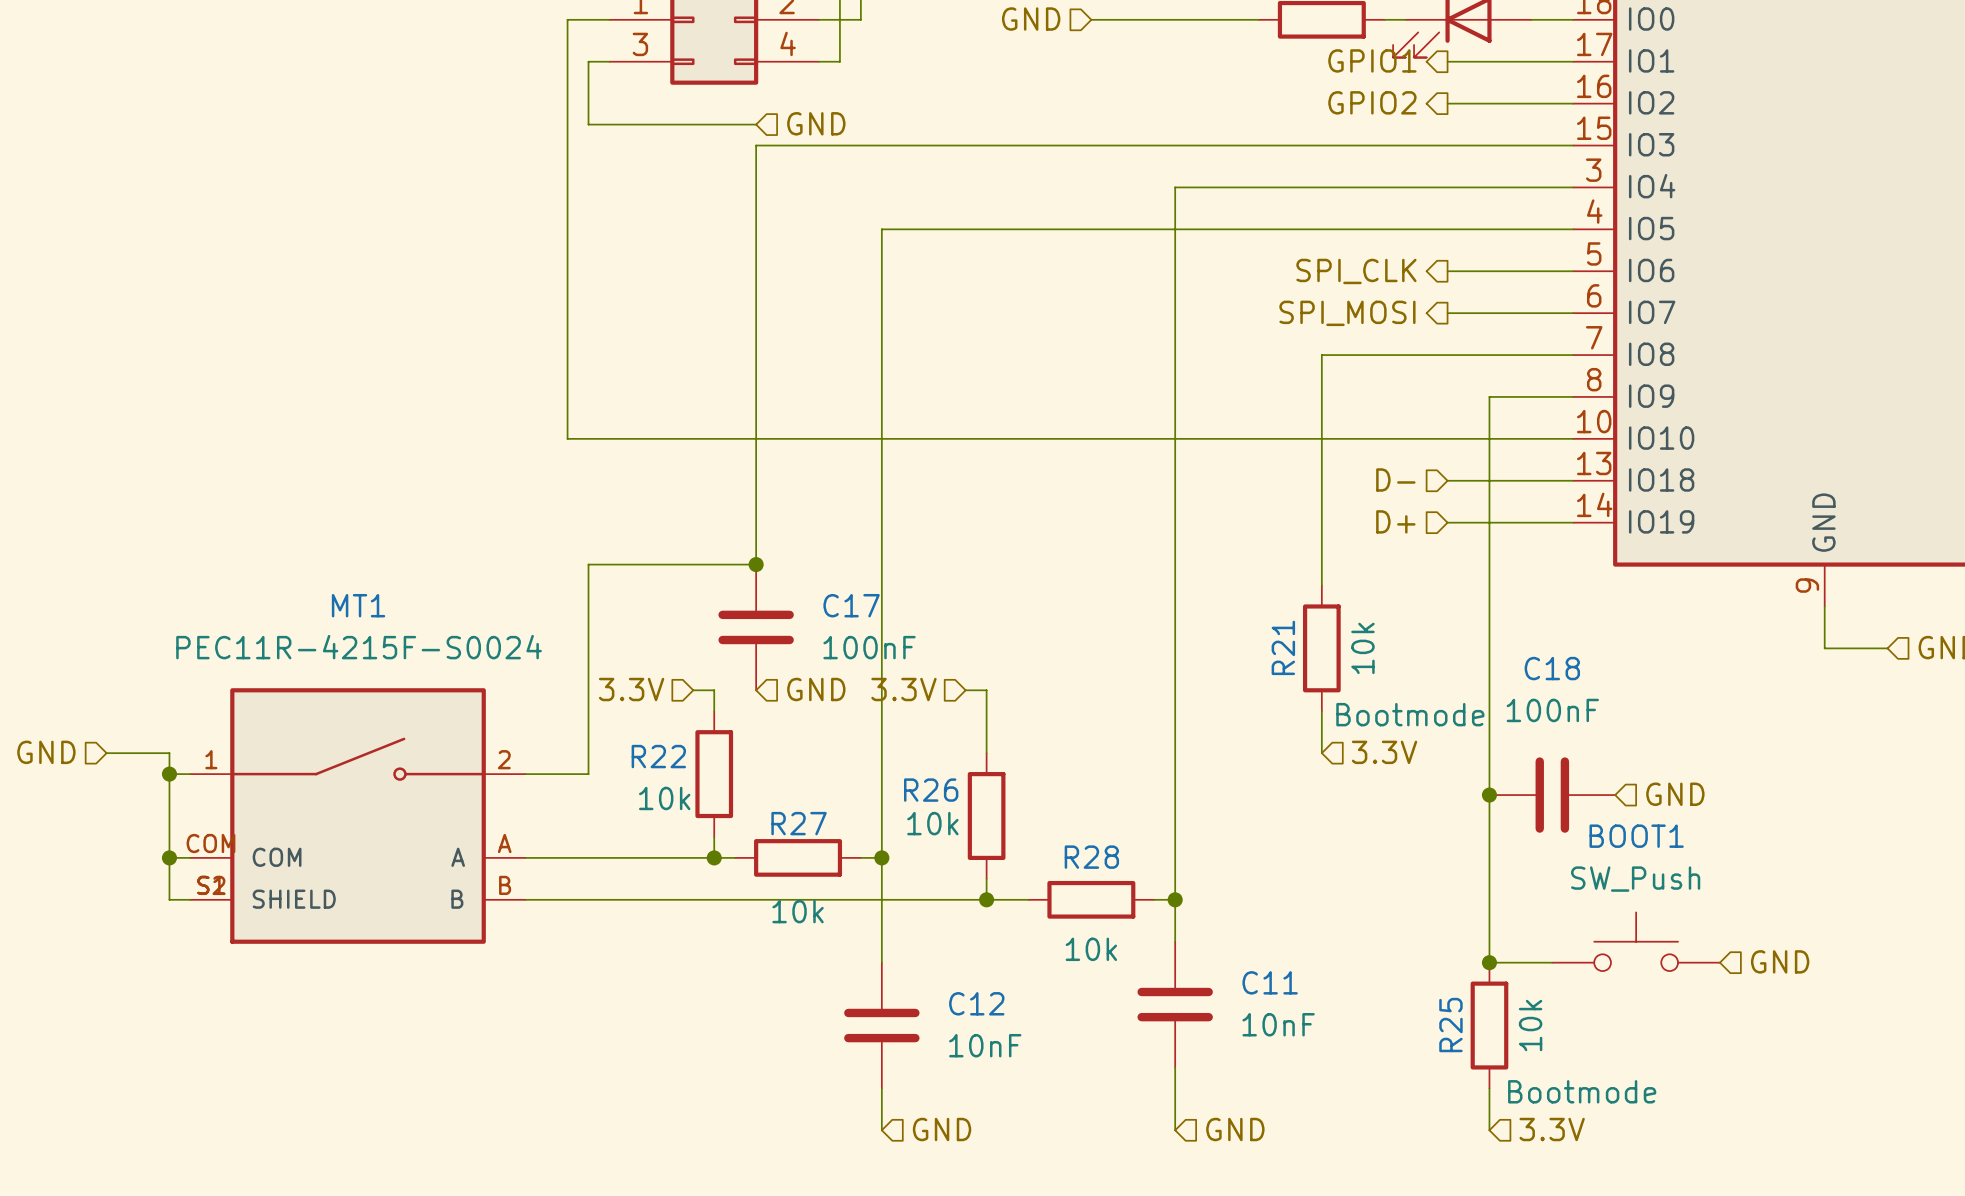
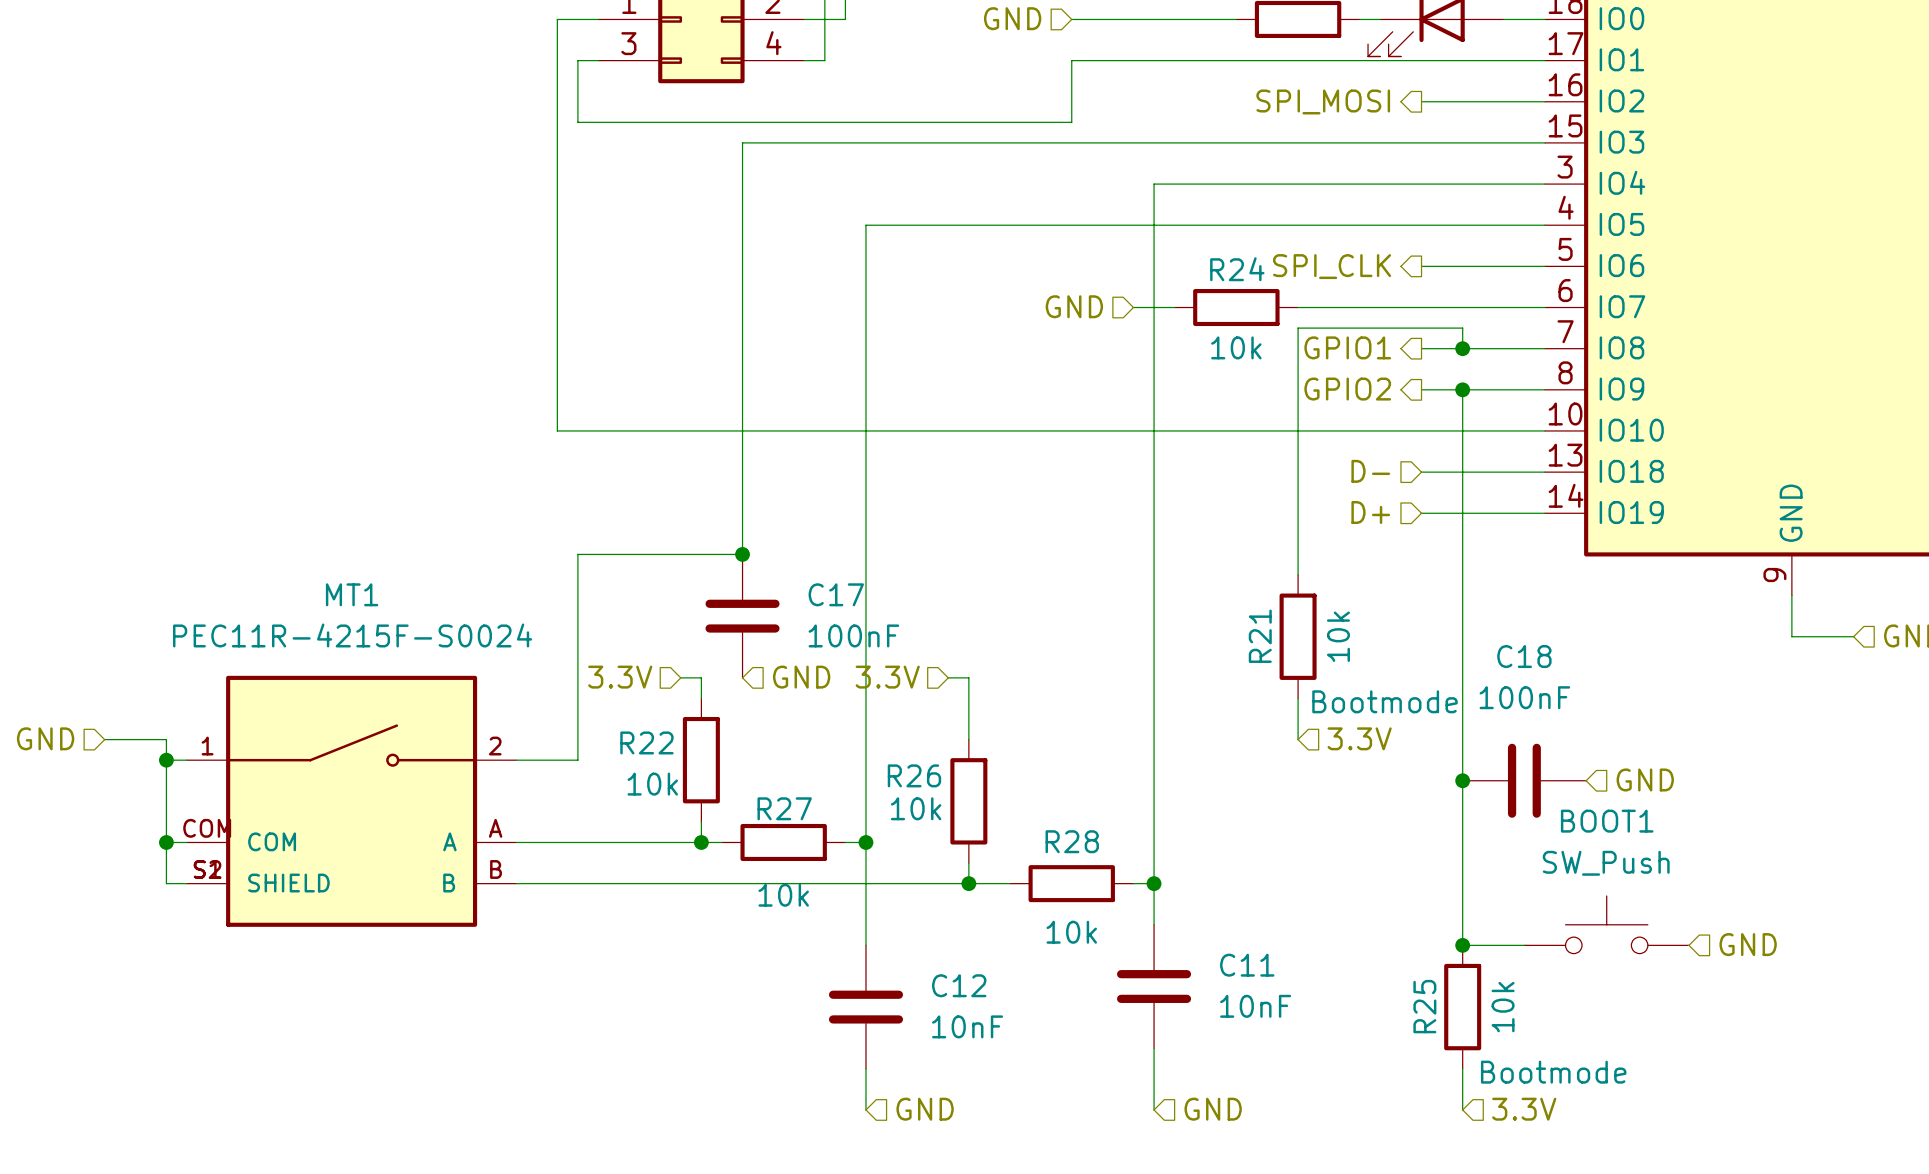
hierarchical label position: GPIO1 (1372, 60) -> GPIO1 (1347, 347)
wire: none -> (1421, 60) (1071, 60) (1071, 122) (742, 122)
hierarchical label: GPIO2 (1372, 102) -> SPI_MOSI (1323, 101)
hierarchical label rotation: 0° (816, 123) -> 180° (1074, 306)
hierarchical label position: GND (816, 123) -> GND (1074, 306)
wire: none -> (1133, 307) (1174, 307)
R24: none -> 10k (1236, 307)
wire: none -> (1298, 307) (1421, 307)
hierarchical label: SPI_MOSI (1347, 313) -> none
wire: (1321, 355) (1447, 355) -> (1298, 348) (1298, 328) (1462, 328) (1462, 348)
junction: none -> (1462, 348)
hierarchical label: none -> GPIO2 (1347, 389)
wire: none -> (1421, 389) (1462, 389)
junction: none -> (1462, 389)

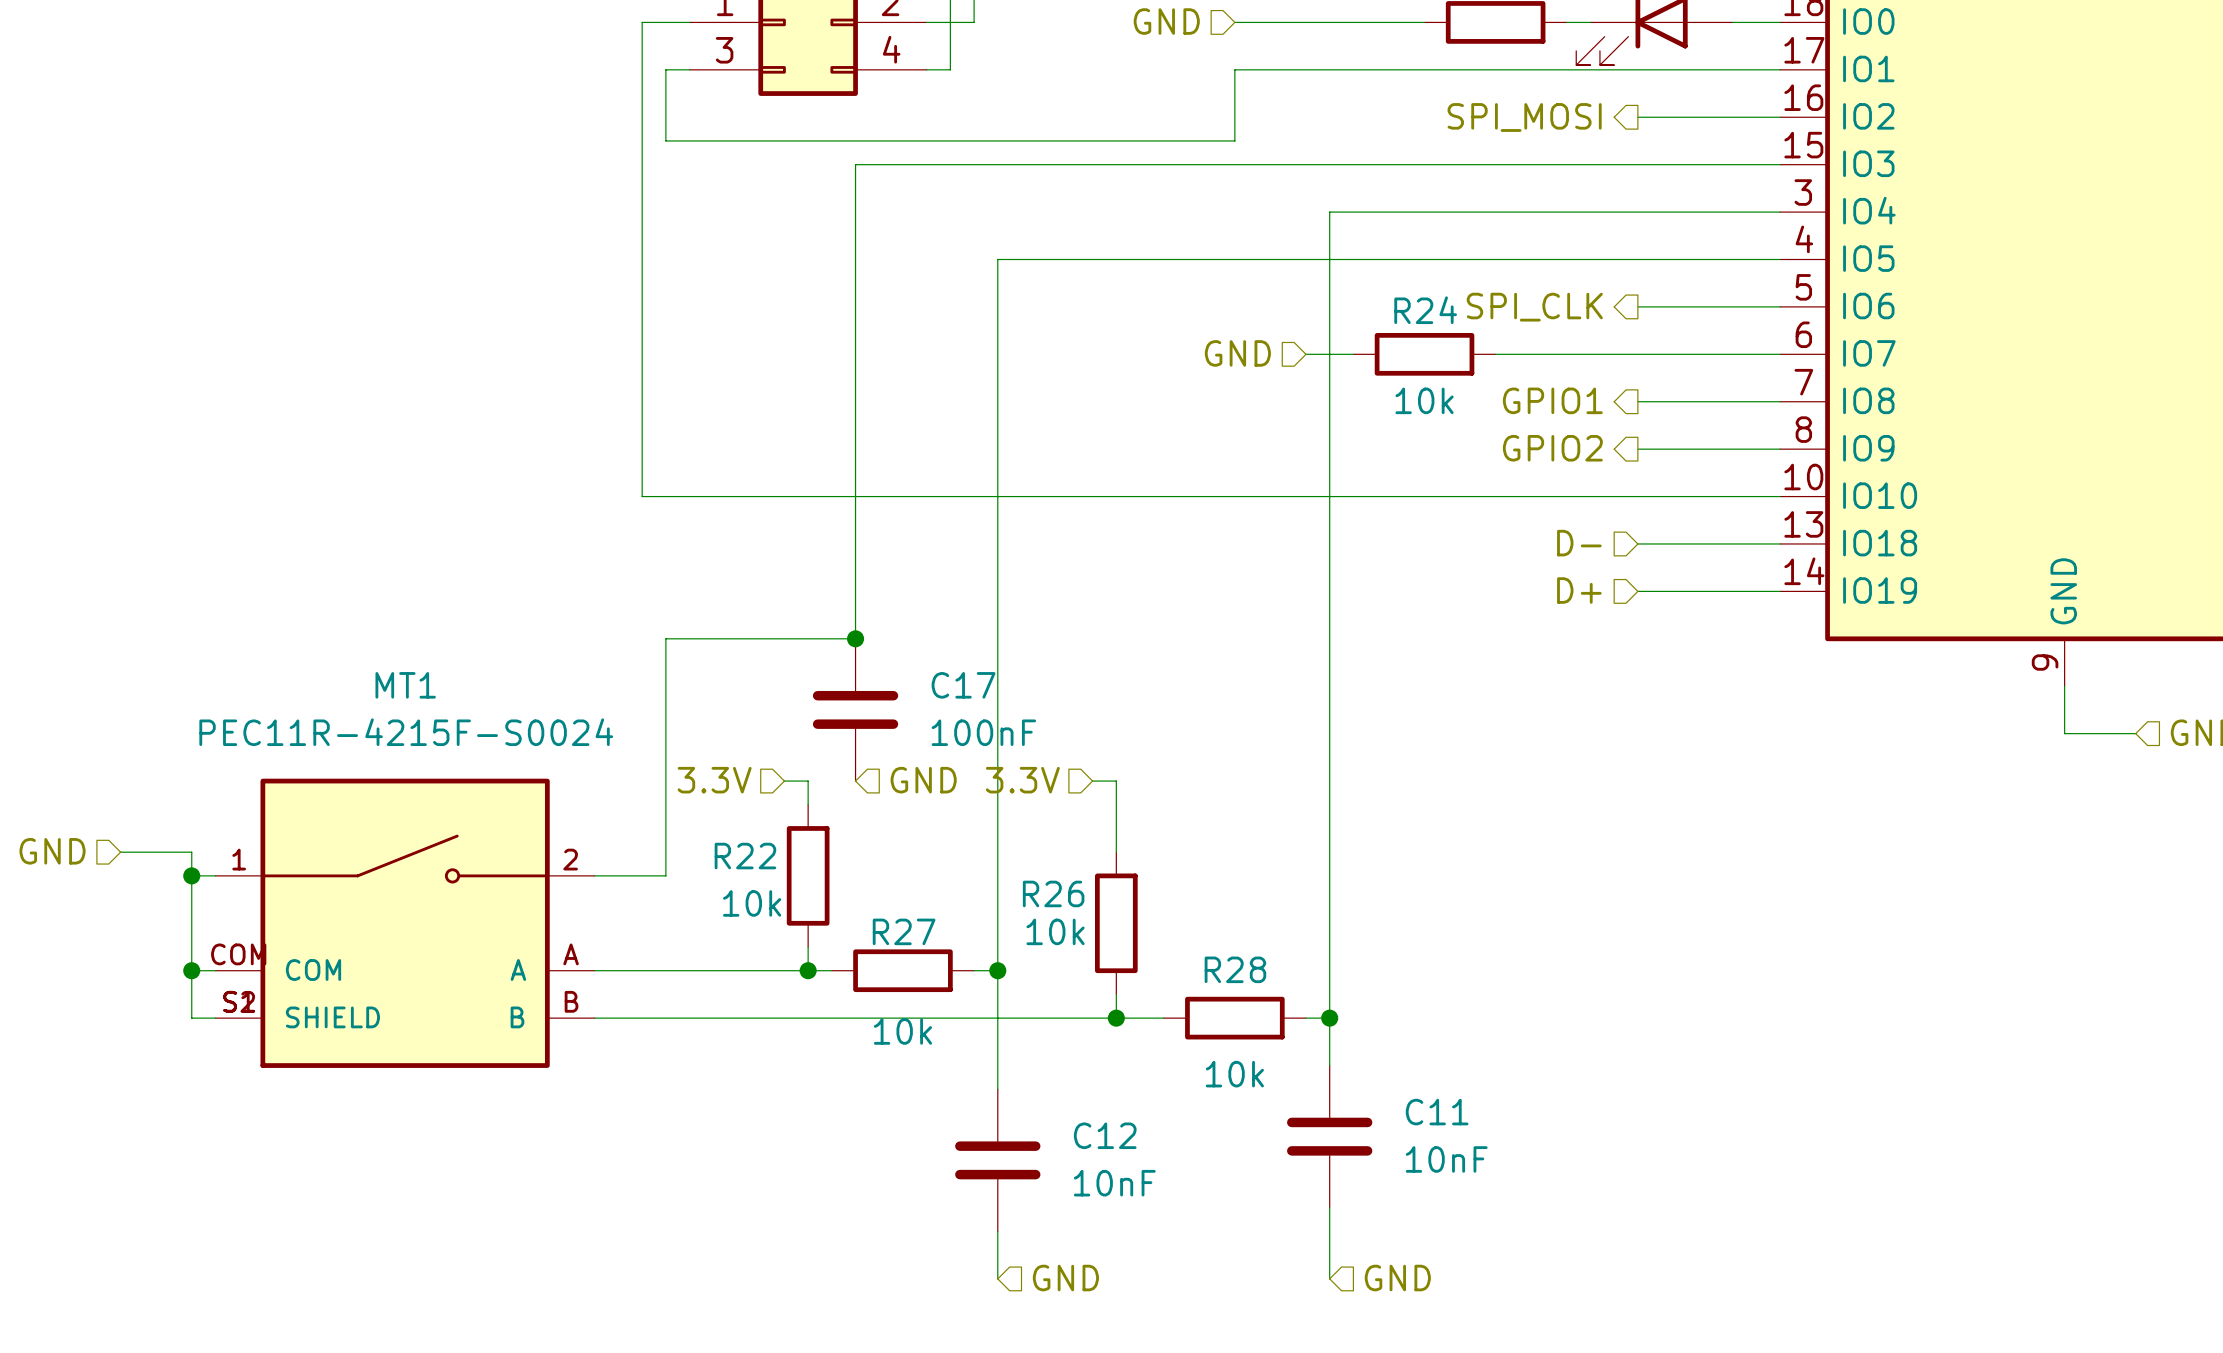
wire: (1462, 348) (1462, 328) (1298, 328) (1298, 575) -> none
junction: (1462, 348) -> none
wire: (1462, 389) (1462, 945) (1524, 945) -> none
junction: (1462, 389) -> none
R21: 10k (1298, 636) -> none
wire: (1298, 698) (1298, 739) -> none
hierarchical label: 3.3V (1359, 738) -> none
hierarchical label: GND (1645, 779) -> none
junction: (1462, 780) -> none
C18: 100nF (1524, 780) -> none
BOOT1: SW_Push (1606, 924) -> none
hierarchical label: GND (1748, 944) -> none
junction: (1462, 945) -> none
R25: 10k (1462, 1007) -> none
wire: (1462, 1068) (1462, 1109) -> none
hierarchical label: 3.3V (1524, 1109) -> none

